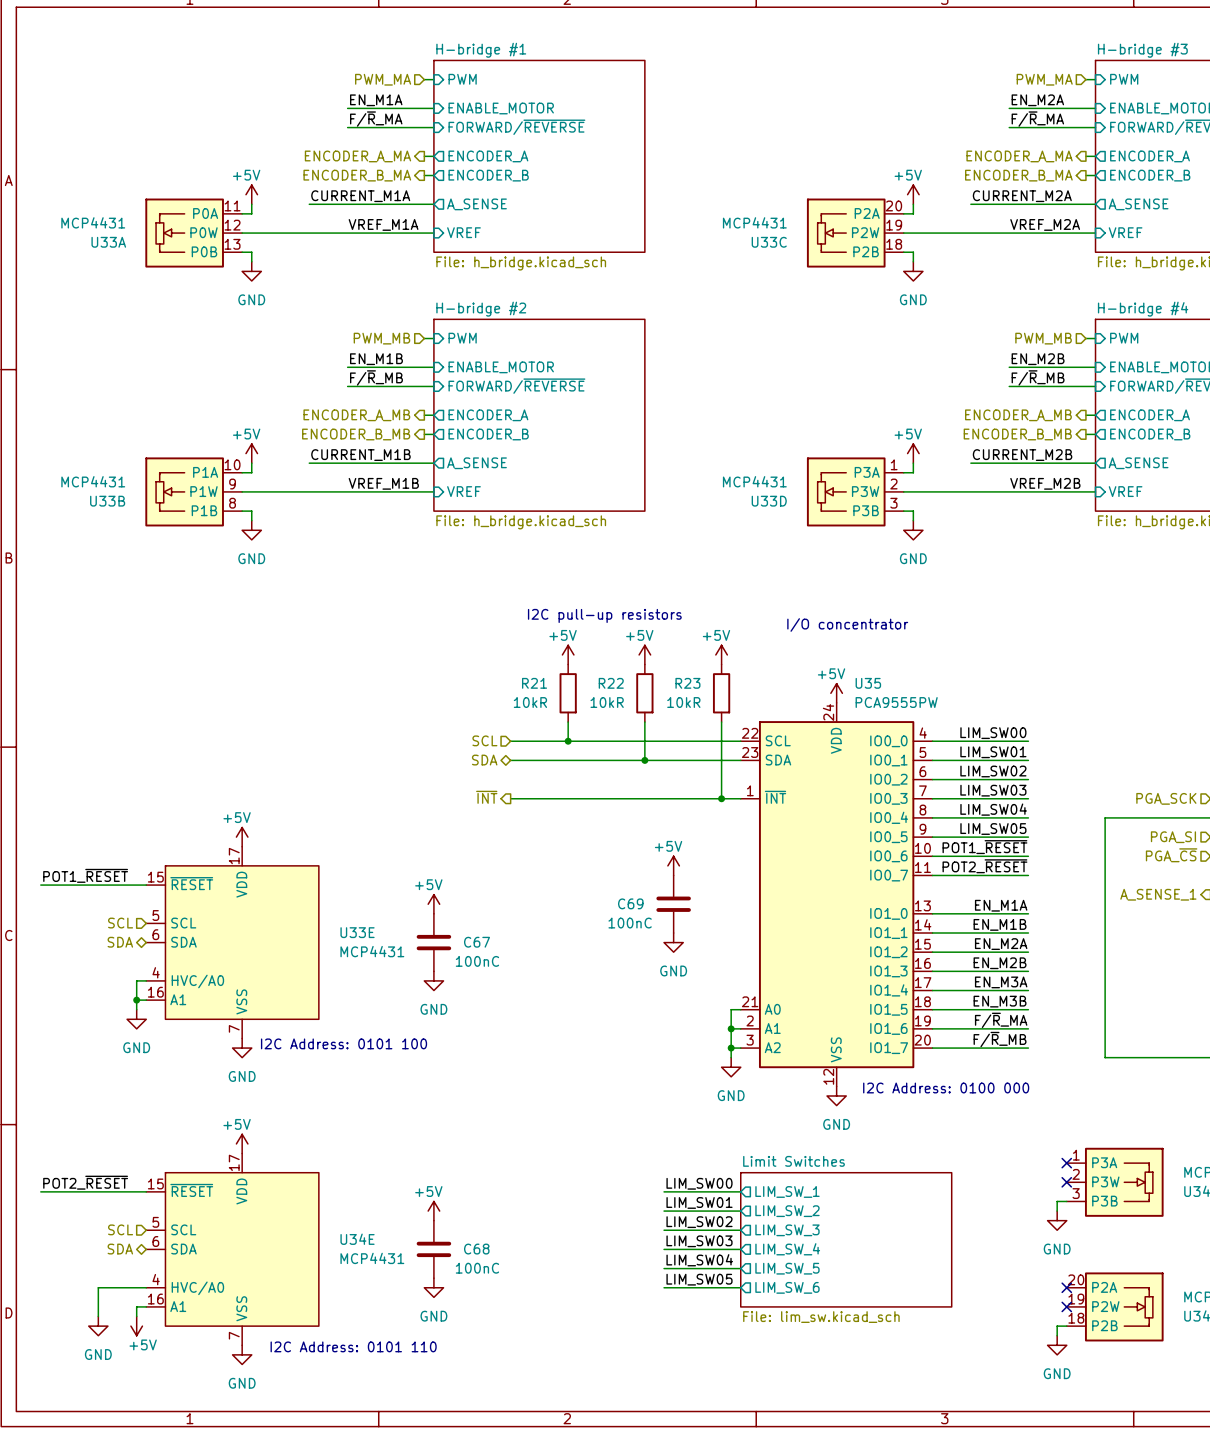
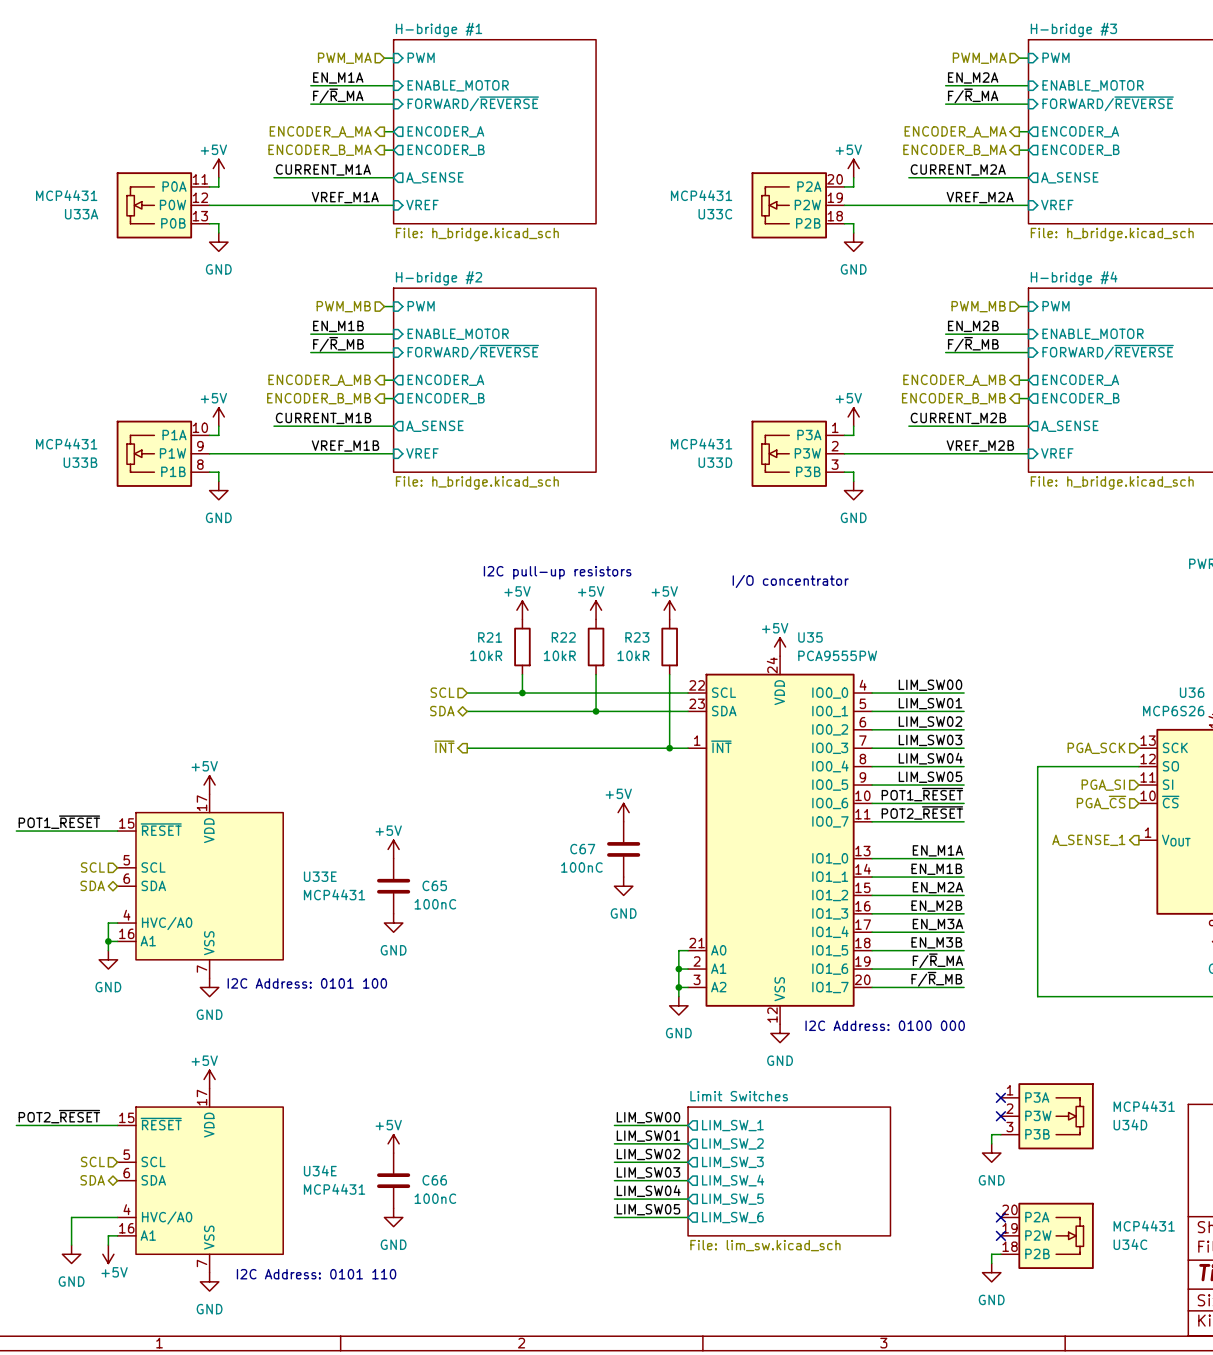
C69 name: C69 (630, 903) -> C67 (582, 849)
C67 name: C67 (477, 942) -> C65 (434, 885)
C68 name: C68 (476, 1249) -> C66 (434, 1180)

